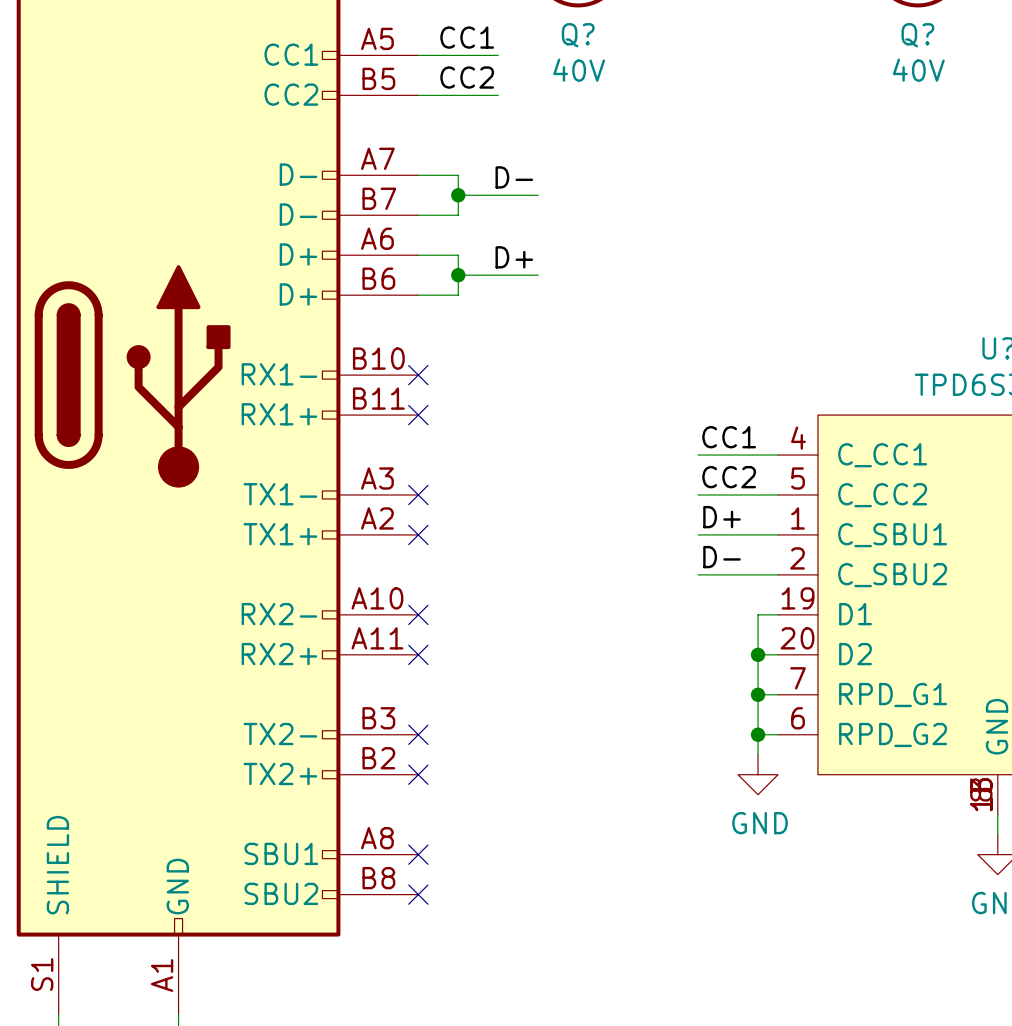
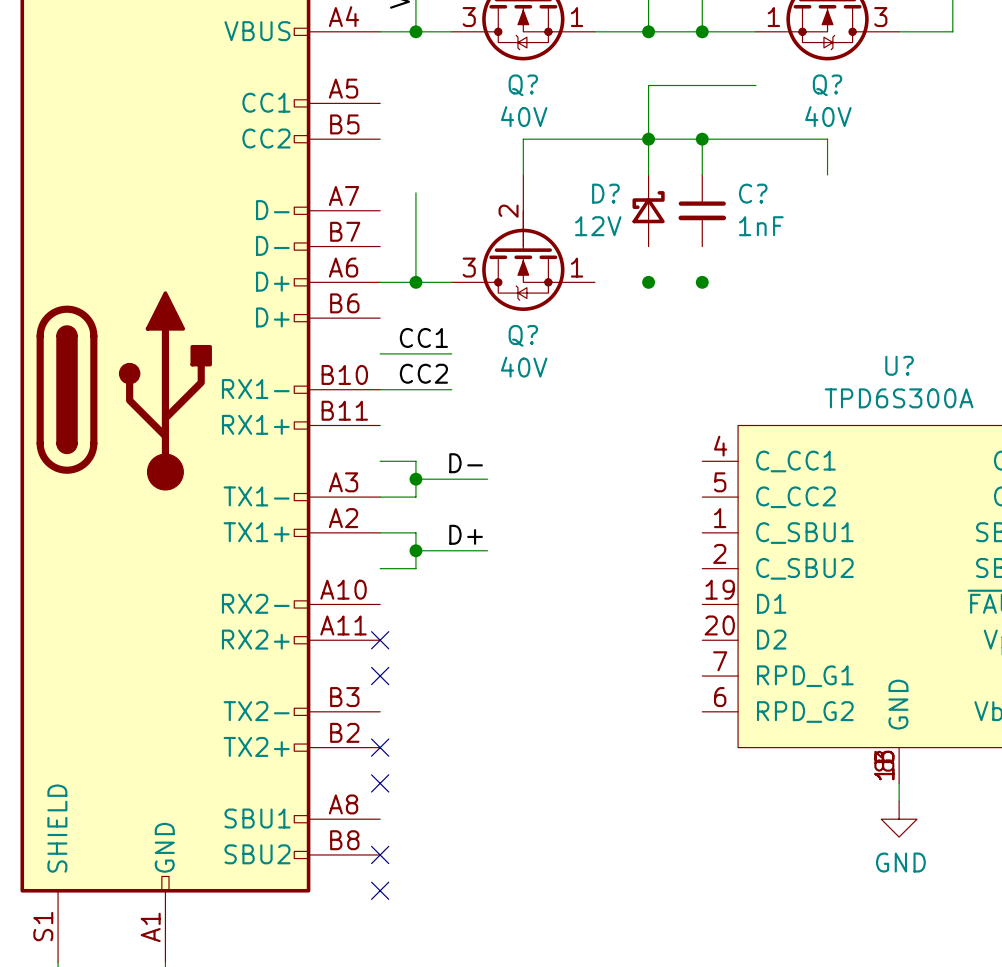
wire: none -> (755, 85) (648, 85) (648, 174)
label: CC1 (467, 37) -> none
wire: (418, 55) (498, 55) -> (380, 353) (451, 353)
label: CC2 (467, 77) -> none
wire: (418, 95) (498, 95) -> (380, 389) (451, 389)
junction: none -> (648, 139)
wire: none -> (702, 139) (702, 174)
junction: none -> (702, 139)
wire: none -> (523, 174) (523, 139) (827, 139) (827, 174)
wire: (418, 175) (458, 175) -> (415, 192) (415, 210)
D?: none -> 12V (648, 210)
C?: none -> 1nF (702, 210)
label: D- (514, 177) -> none
wire: (458, 195) (538, 195) -> (415, 479) (487, 479)
junction: (458, 195) -> none
Q?: none -> 40V (523, 242)
wire: (418, 215) (458, 215) -> (451, 282) (415, 282) (415, 246)
wire: (458, 255) (458, 295) (418, 295) -> none
junction: none -> (648, 282)
junction: none -> (702, 282)
label: D+ (514, 257) -> none
wire: (458, 275) (538, 275) -> (415, 550) (487, 550)
junction position: (458, 275) -> (415, 282)
label: none -> CC1 (423, 337)
label: none -> CC2 (423, 373)
no-connect mark: (418, 375) -> none
no-connect mark: (418, 415) -> none
label: CC1 (729, 437) -> none
wire: none -> (380, 461) (415, 461) (415, 497) (380, 497)
wire: (698, 455) (778, 455) -> none
label: none -> D- (466, 463)
junction: none -> (415, 479)
label: CC2 (729, 477) -> none
no-connect mark: (418, 494) -> none
wire: (698, 494) (778, 494) -> none
label: D+ (722, 517) -> none
wire: none -> (380, 532) (415, 532) (415, 568) (380, 568)
no-connect mark: (418, 534) -> none
wire: (698, 534) (778, 534) -> none
label: none -> D+ (466, 534)
junction: none -> (415, 550)
label: D- (722, 557) -> none
wire: (698, 574) (778, 574) -> none
no-connect mark: (418, 614) -> none
wire: (778, 614) (758, 614) (758, 754) -> none
wire: (758, 654) (778, 654) -> none
junction: (758, 654) -> none
no-connect mark: none -> (380, 676)
wire: (758, 694) (778, 694) -> none
junction: (758, 694) -> none
no-connect mark: (418, 734) -> none
wire: (758, 734) (778, 734) -> none
junction: (758, 734) -> none
power symbol: GND (758, 774) -> none
no-connect mark: none -> (380, 783)
no-connect mark: (418, 854) -> none
no-connect mark: none -> (380, 890)

